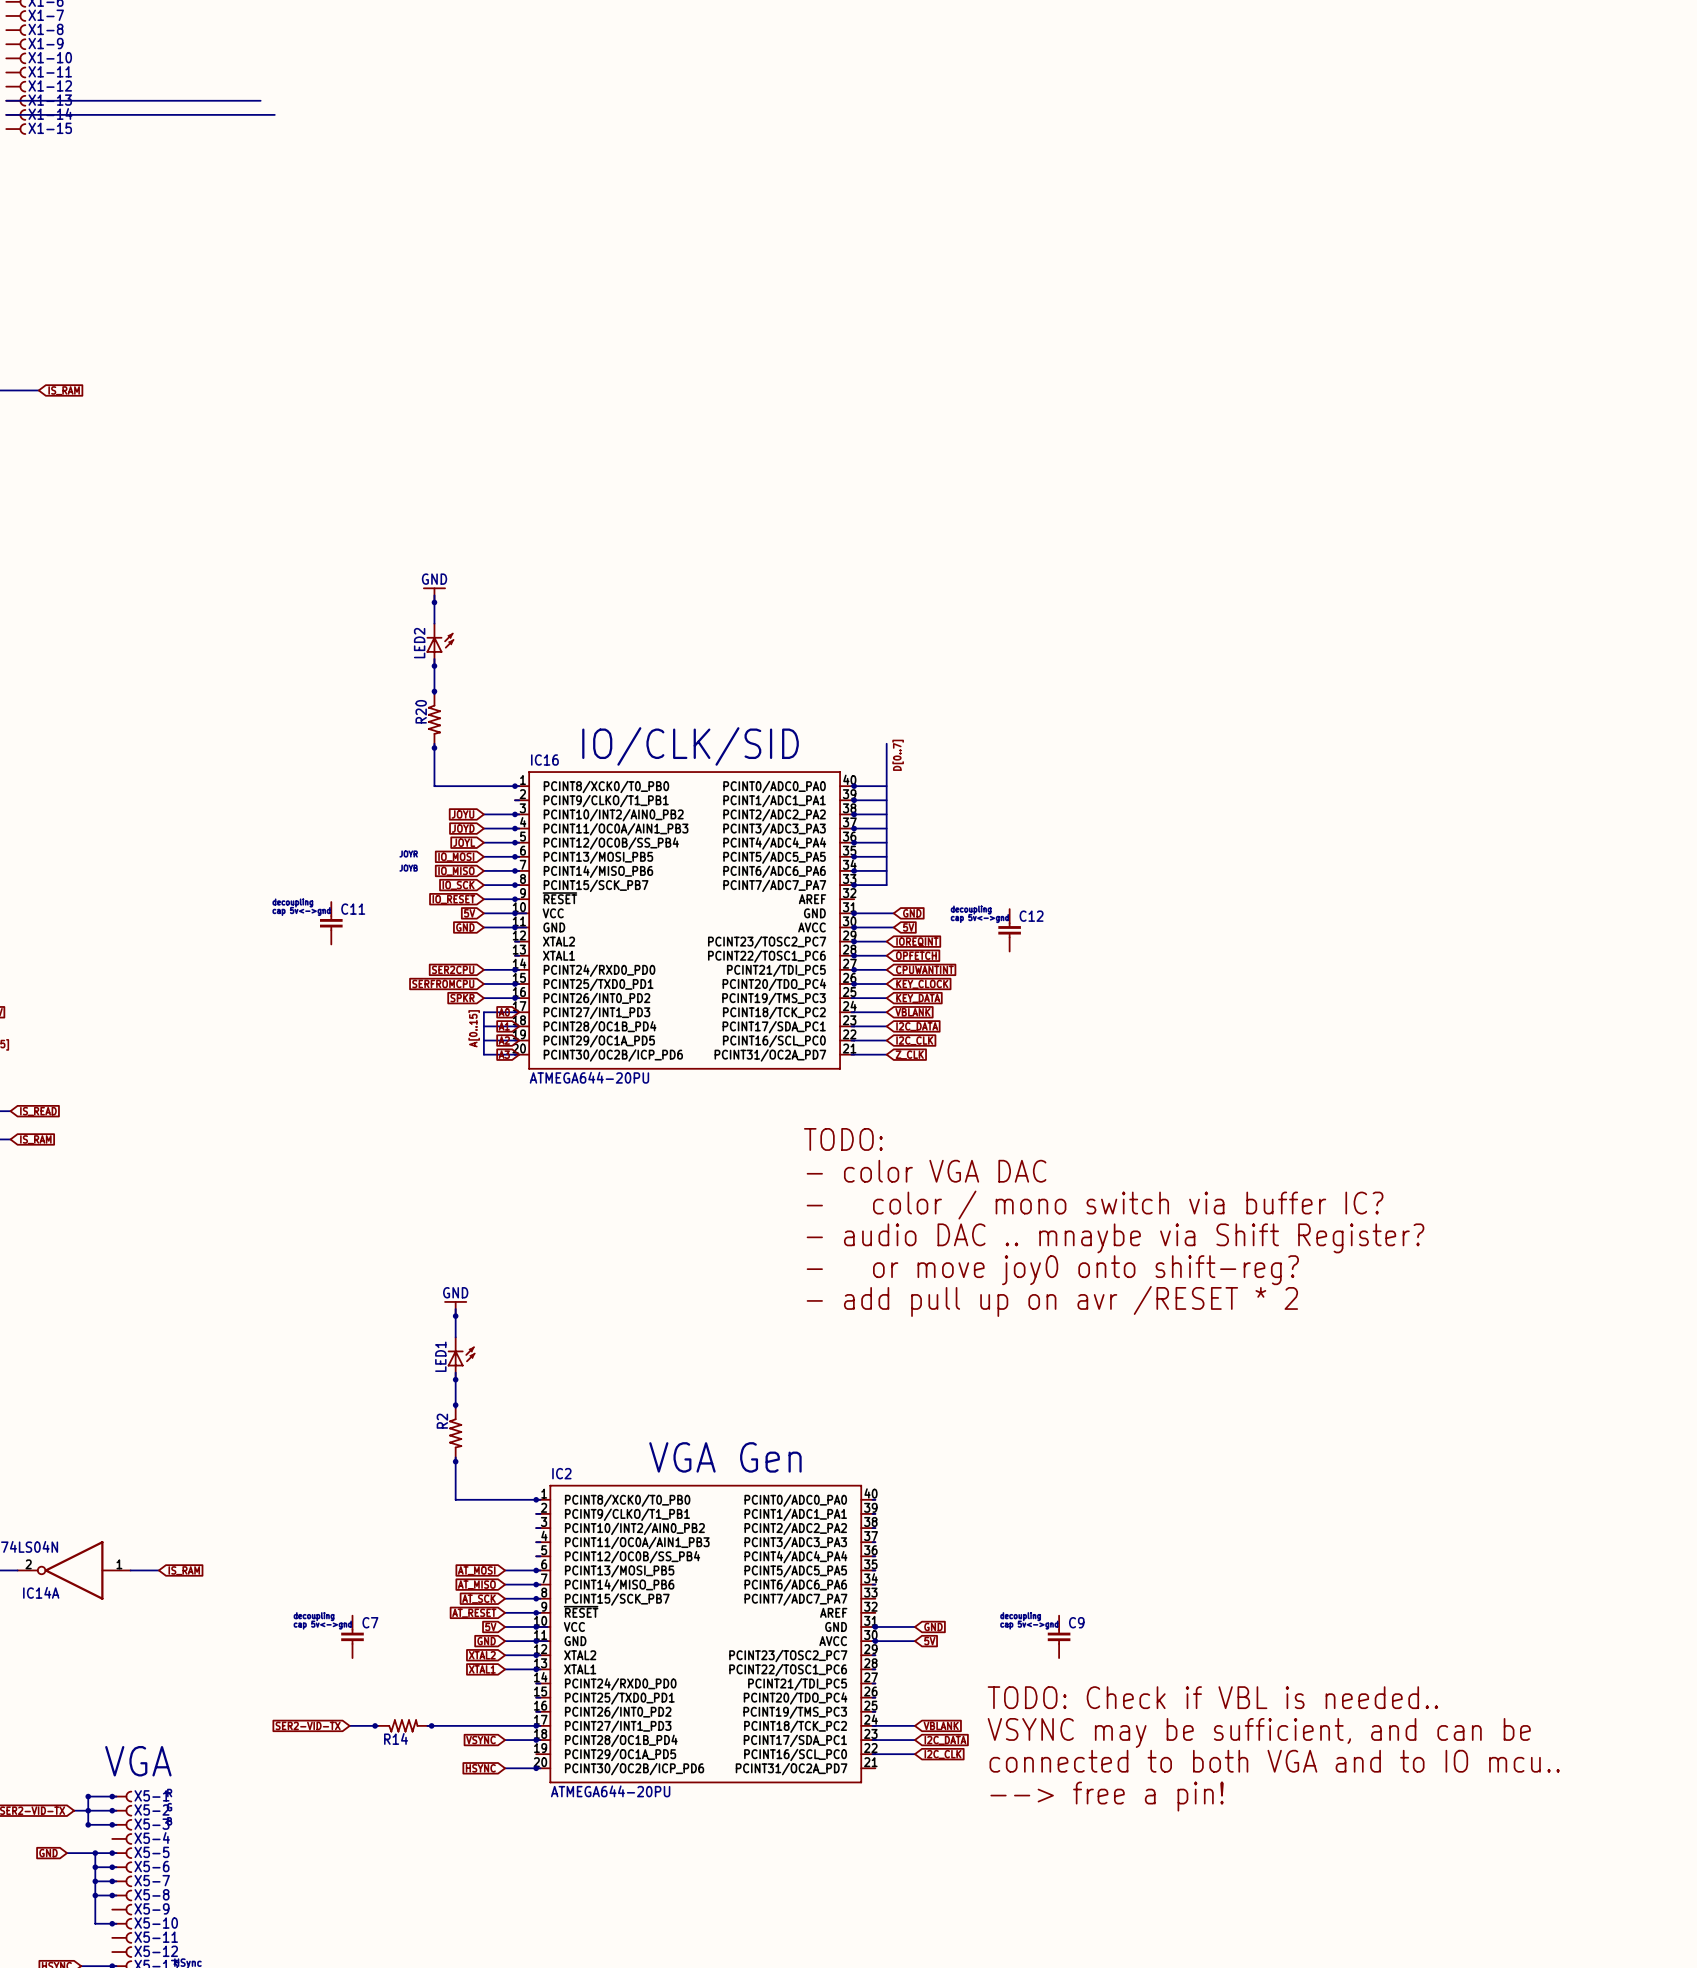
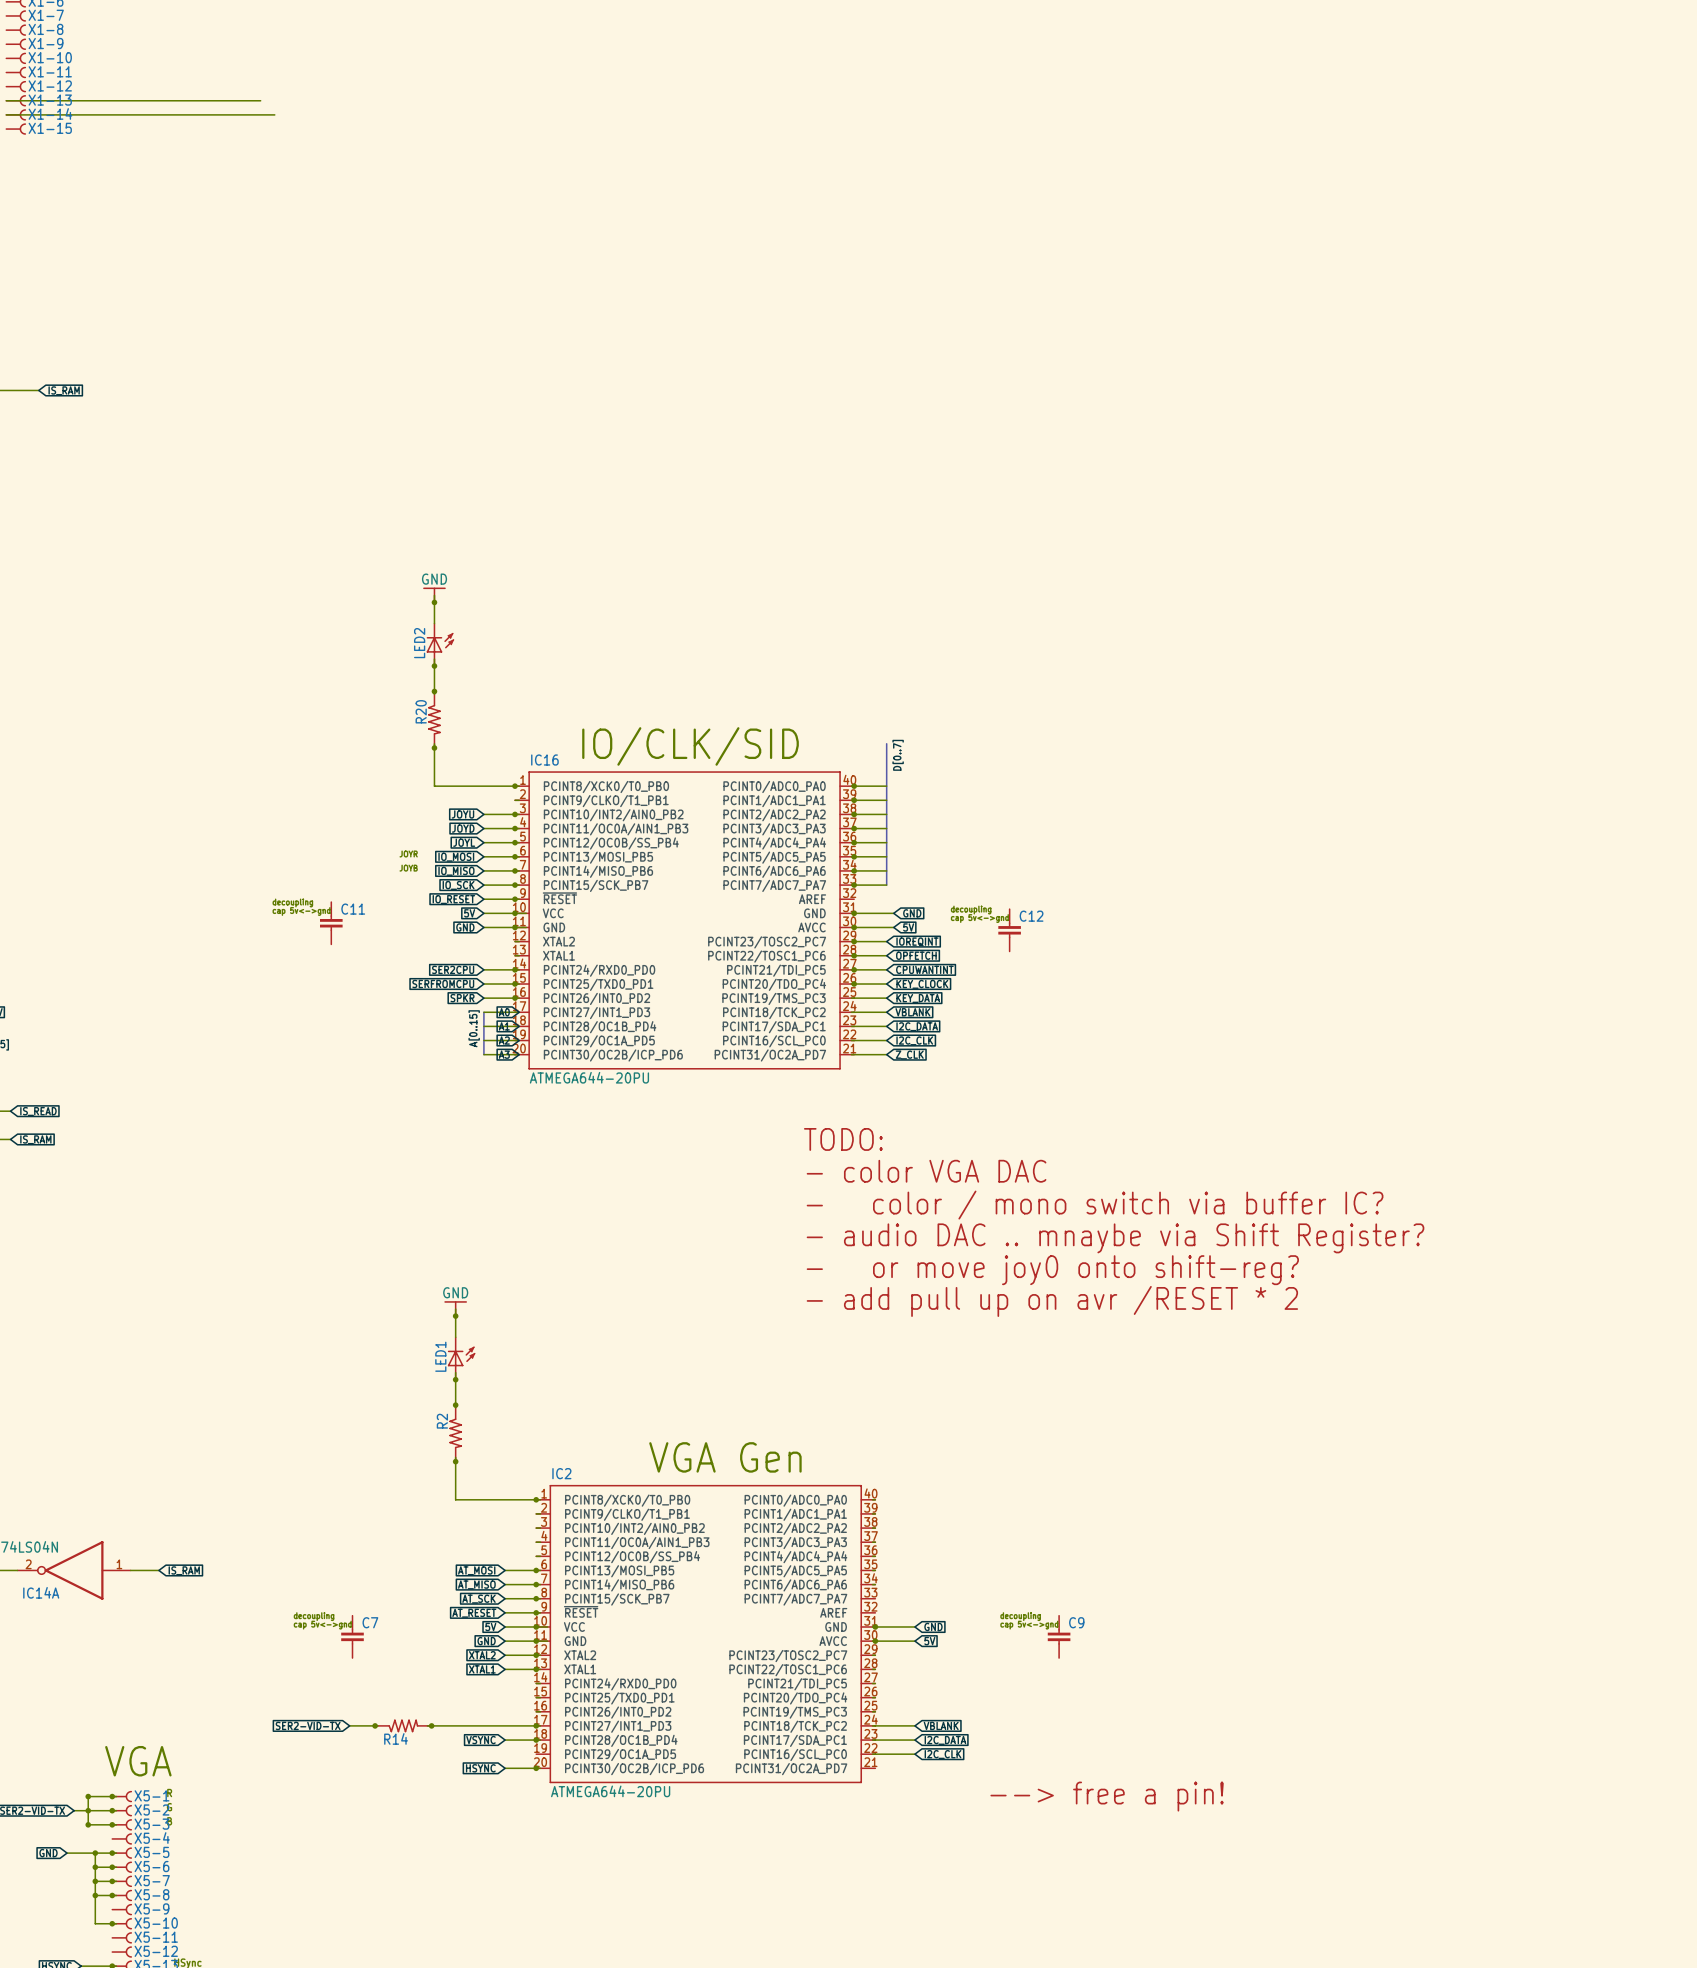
text: TODO: Check if VBL is needed.. (1212, 1697) -> none
text: VSYNC may be sufficient, and can be (1259, 1732) -> none
text: connected to both VGA and to IO mcu.. (1274, 1761) -> none

